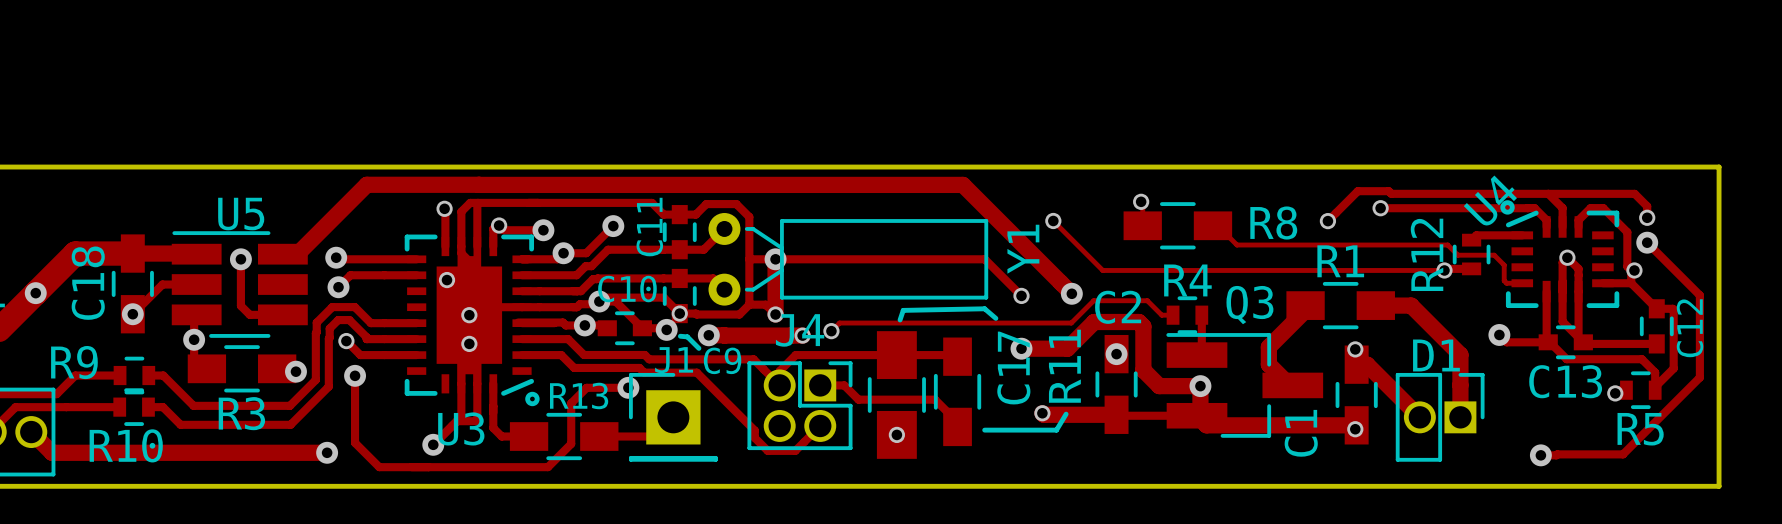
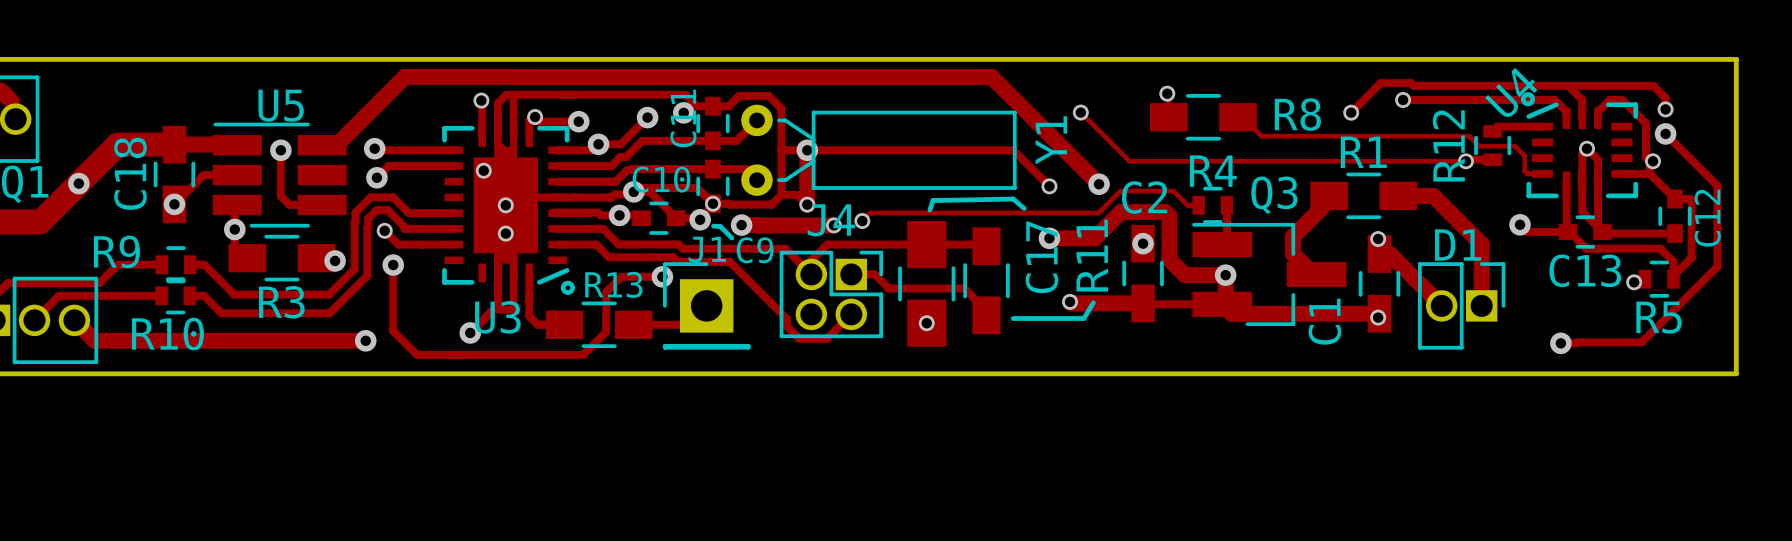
via: none -> (683, 112)

